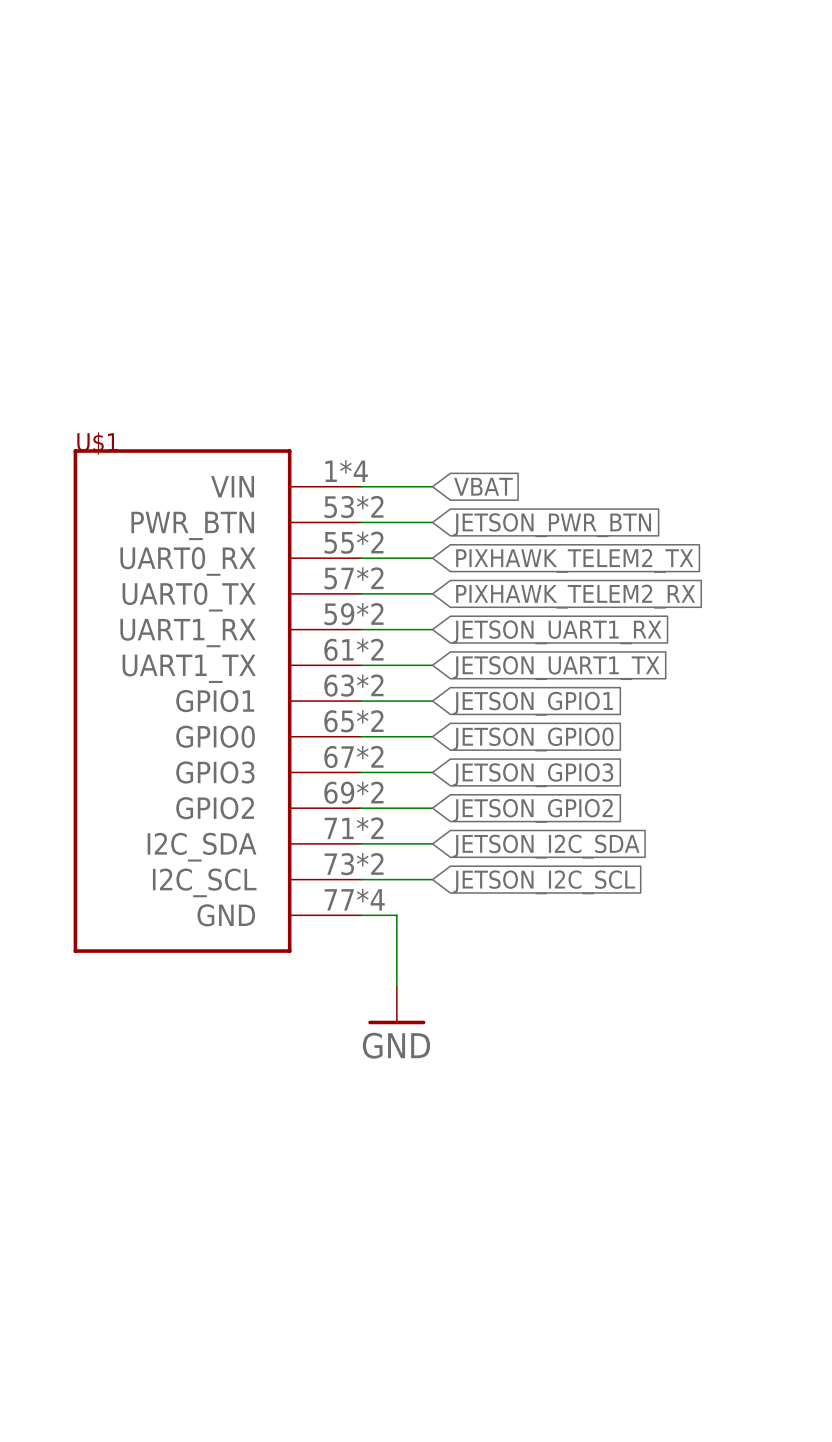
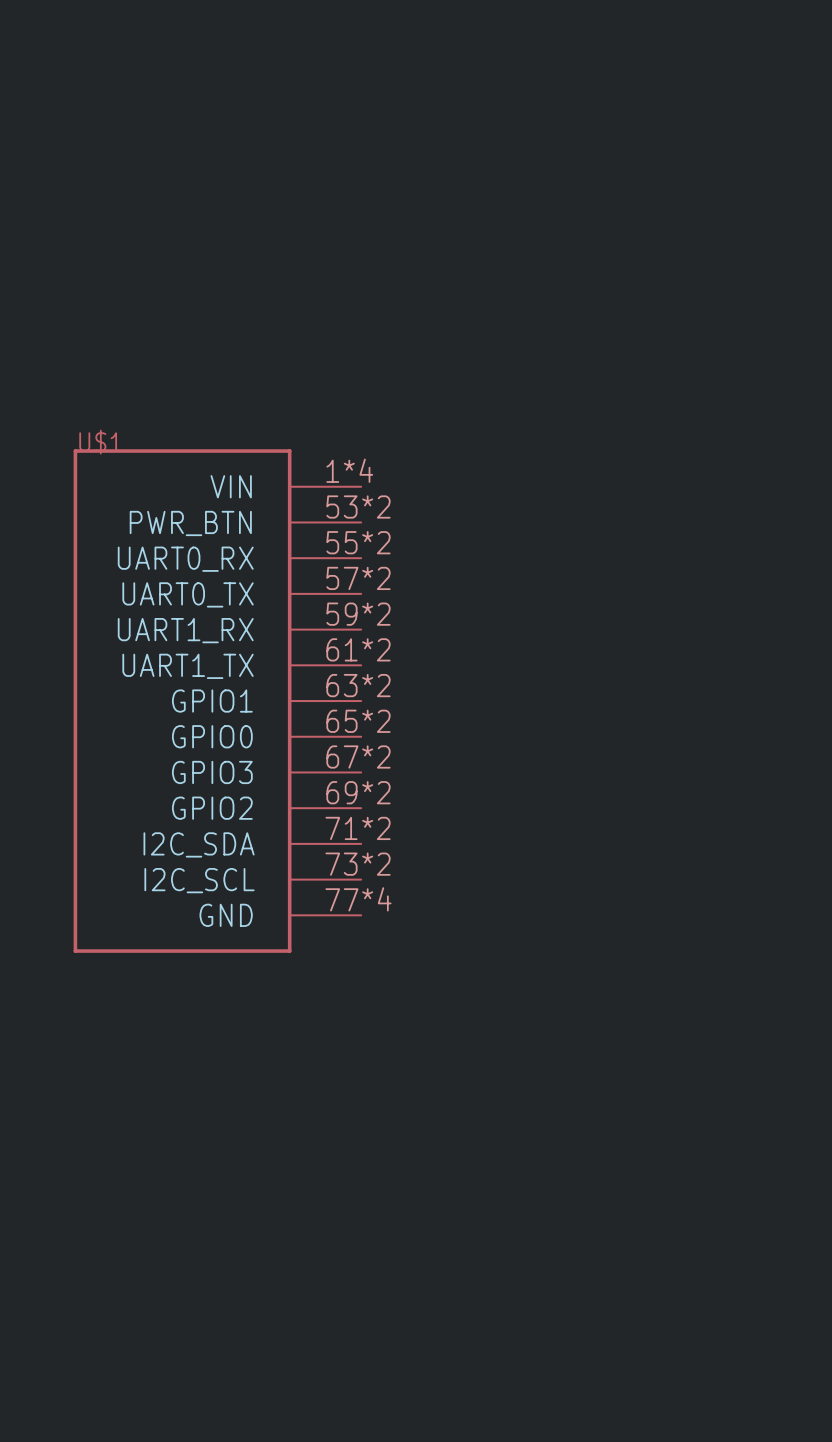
wire: (361, 486) (432, 486) -> none
global label: VBAT (483, 486) -> none
wire: (361, 522) (432, 522) -> none
global label: JETSON_PWR_BTN (551, 525) -> none
wire: (361, 558) (432, 558) -> none
global label: PIXHAWK_TELEM2_TX (574, 560) -> none
wire: (361, 593) (432, 593) -> none
global label: PIXHAWK_TELEM2_RX (575, 596) -> none
wire: (361, 629) (432, 629) -> none
global label: JETSON_UART1_RX (557, 632) -> none
wire: (361, 665) (432, 665) -> none
global label: JETSON_UART1_TX (556, 668) -> none
wire: (361, 701) (432, 701) -> none
global label: JETSON_GPIO1 (532, 703) -> none
wire: (361, 736) (432, 736) -> none
global label: JETSON_GPIO0 (533, 739) -> none
wire: (361, 772) (432, 772) -> none
global label: JETSON_GPIO3 (533, 775) -> none
wire: (361, 808) (432, 808) -> none
global label: JETSON_GPIO2 (532, 810) -> none
wire: (361, 843) (432, 843) -> none
global label: JETSON_I2C_SDA (546, 846) -> none
wire: (361, 879) (432, 879) -> none
global label: JETSON_I2C_SCL (544, 882) -> none
wire: (361, 915) (396, 915) (396, 986) -> none
power symbol: GND (396, 1005) -> none

